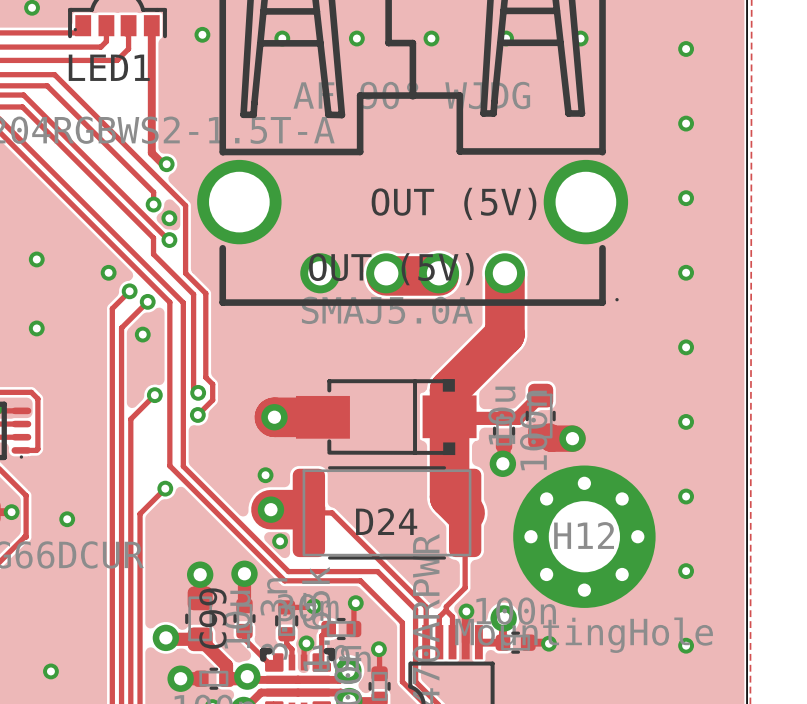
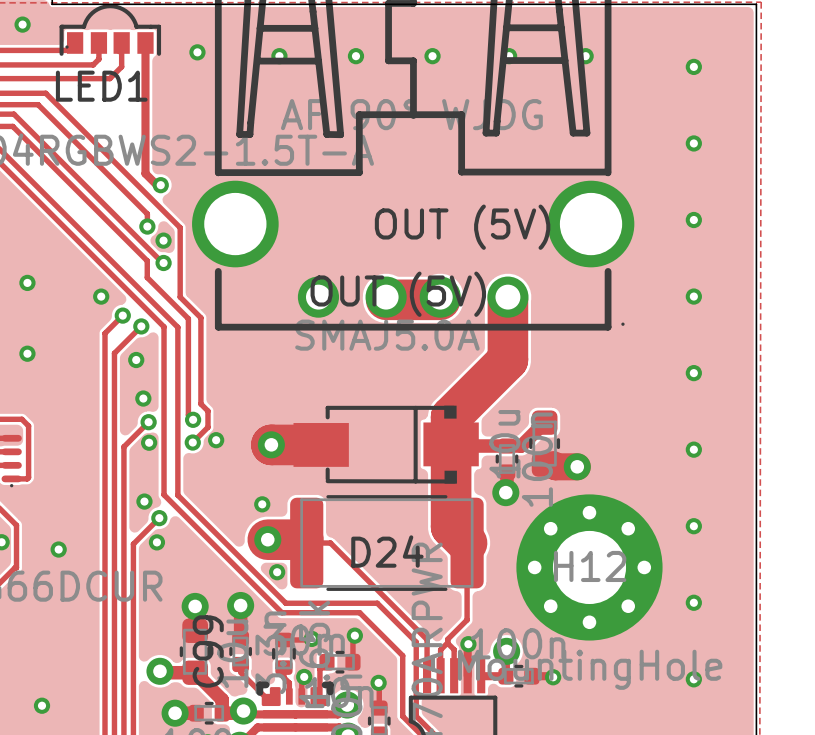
via: none -> (143, 398)
via: none -> (216, 440)
via: none -> (149, 442)
via: none -> (144, 501)
via: none -> (156, 542)

